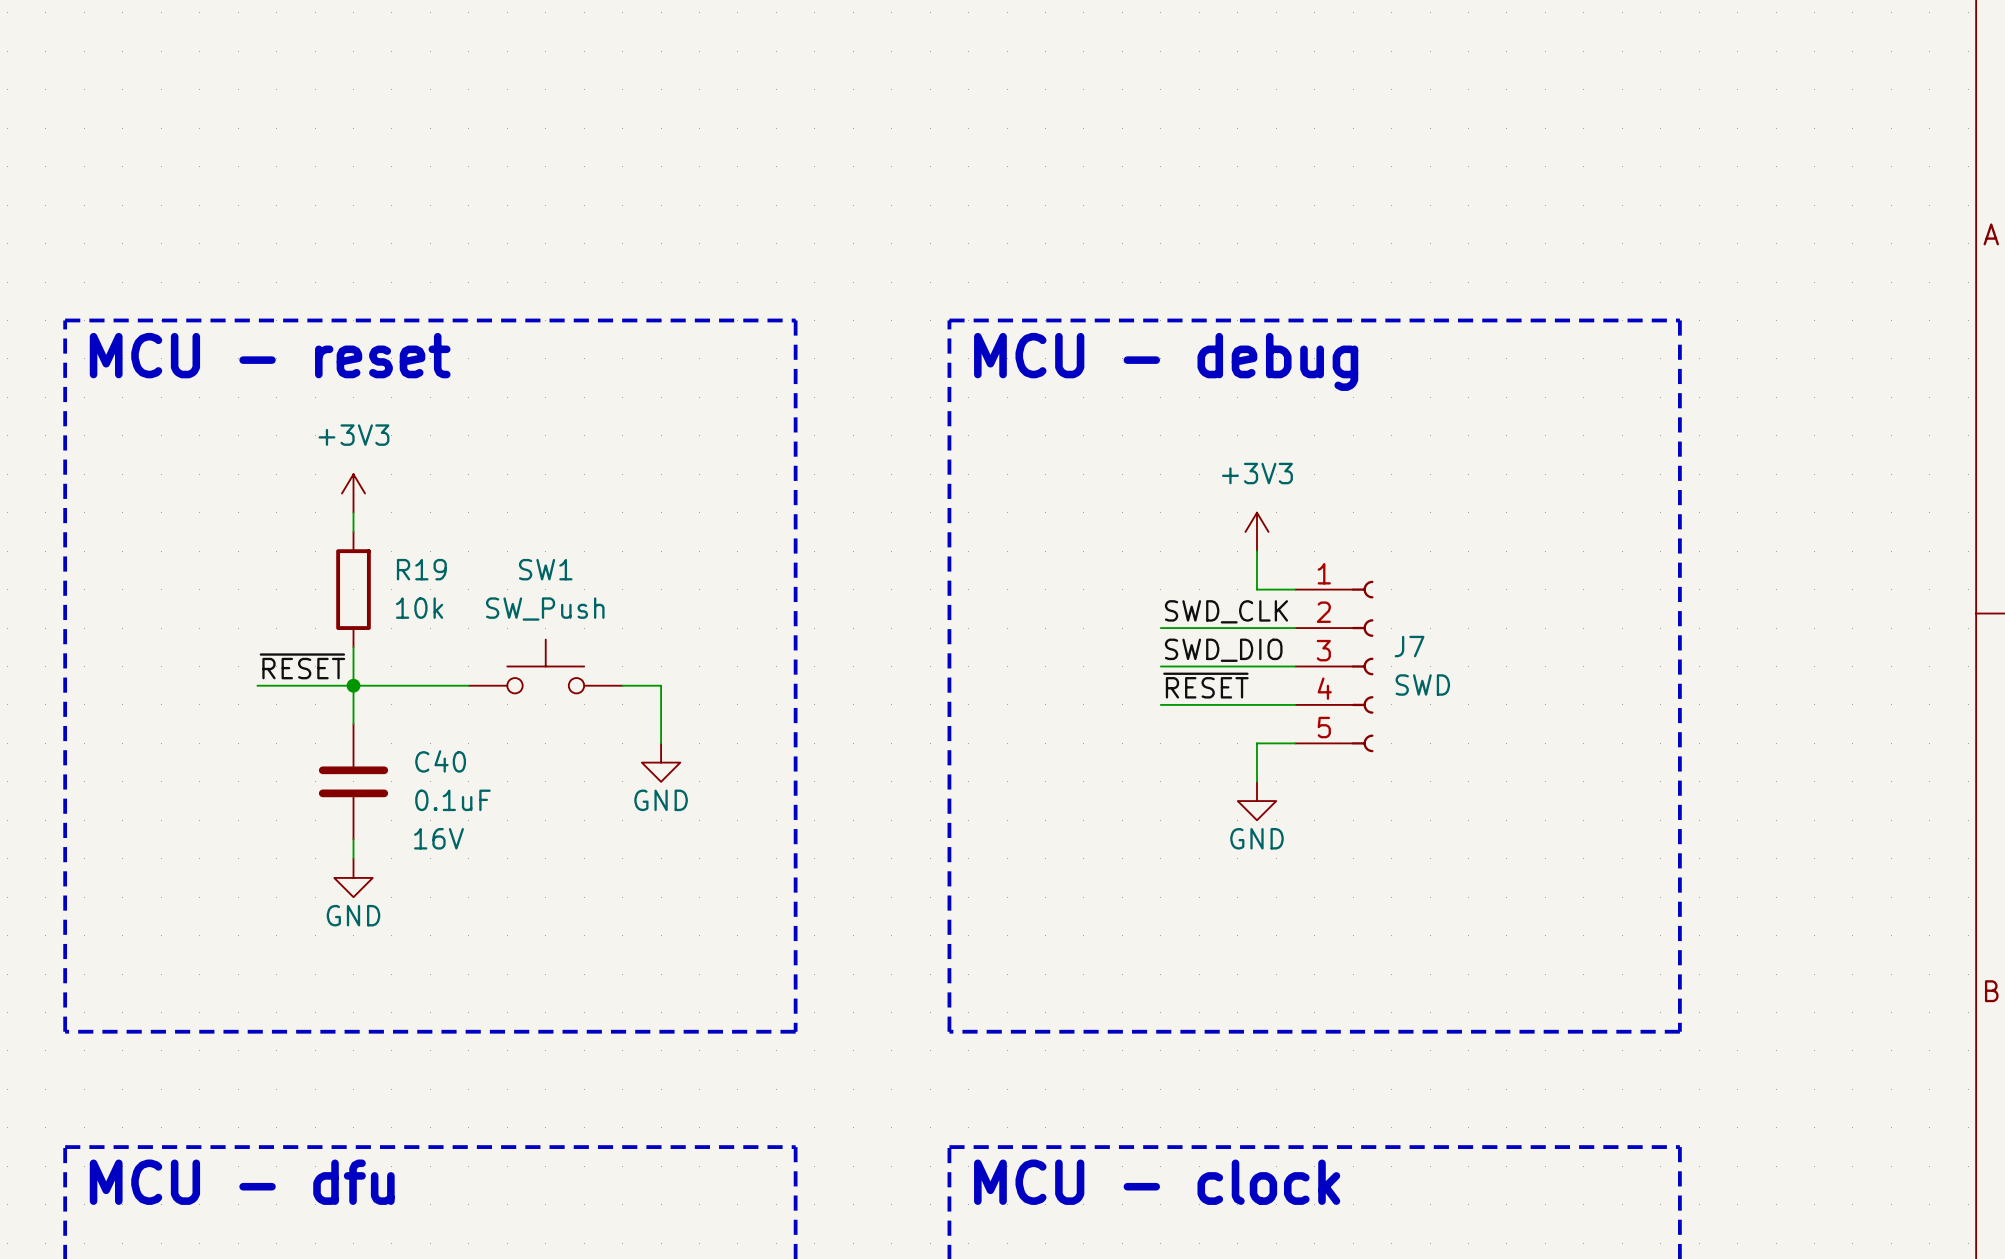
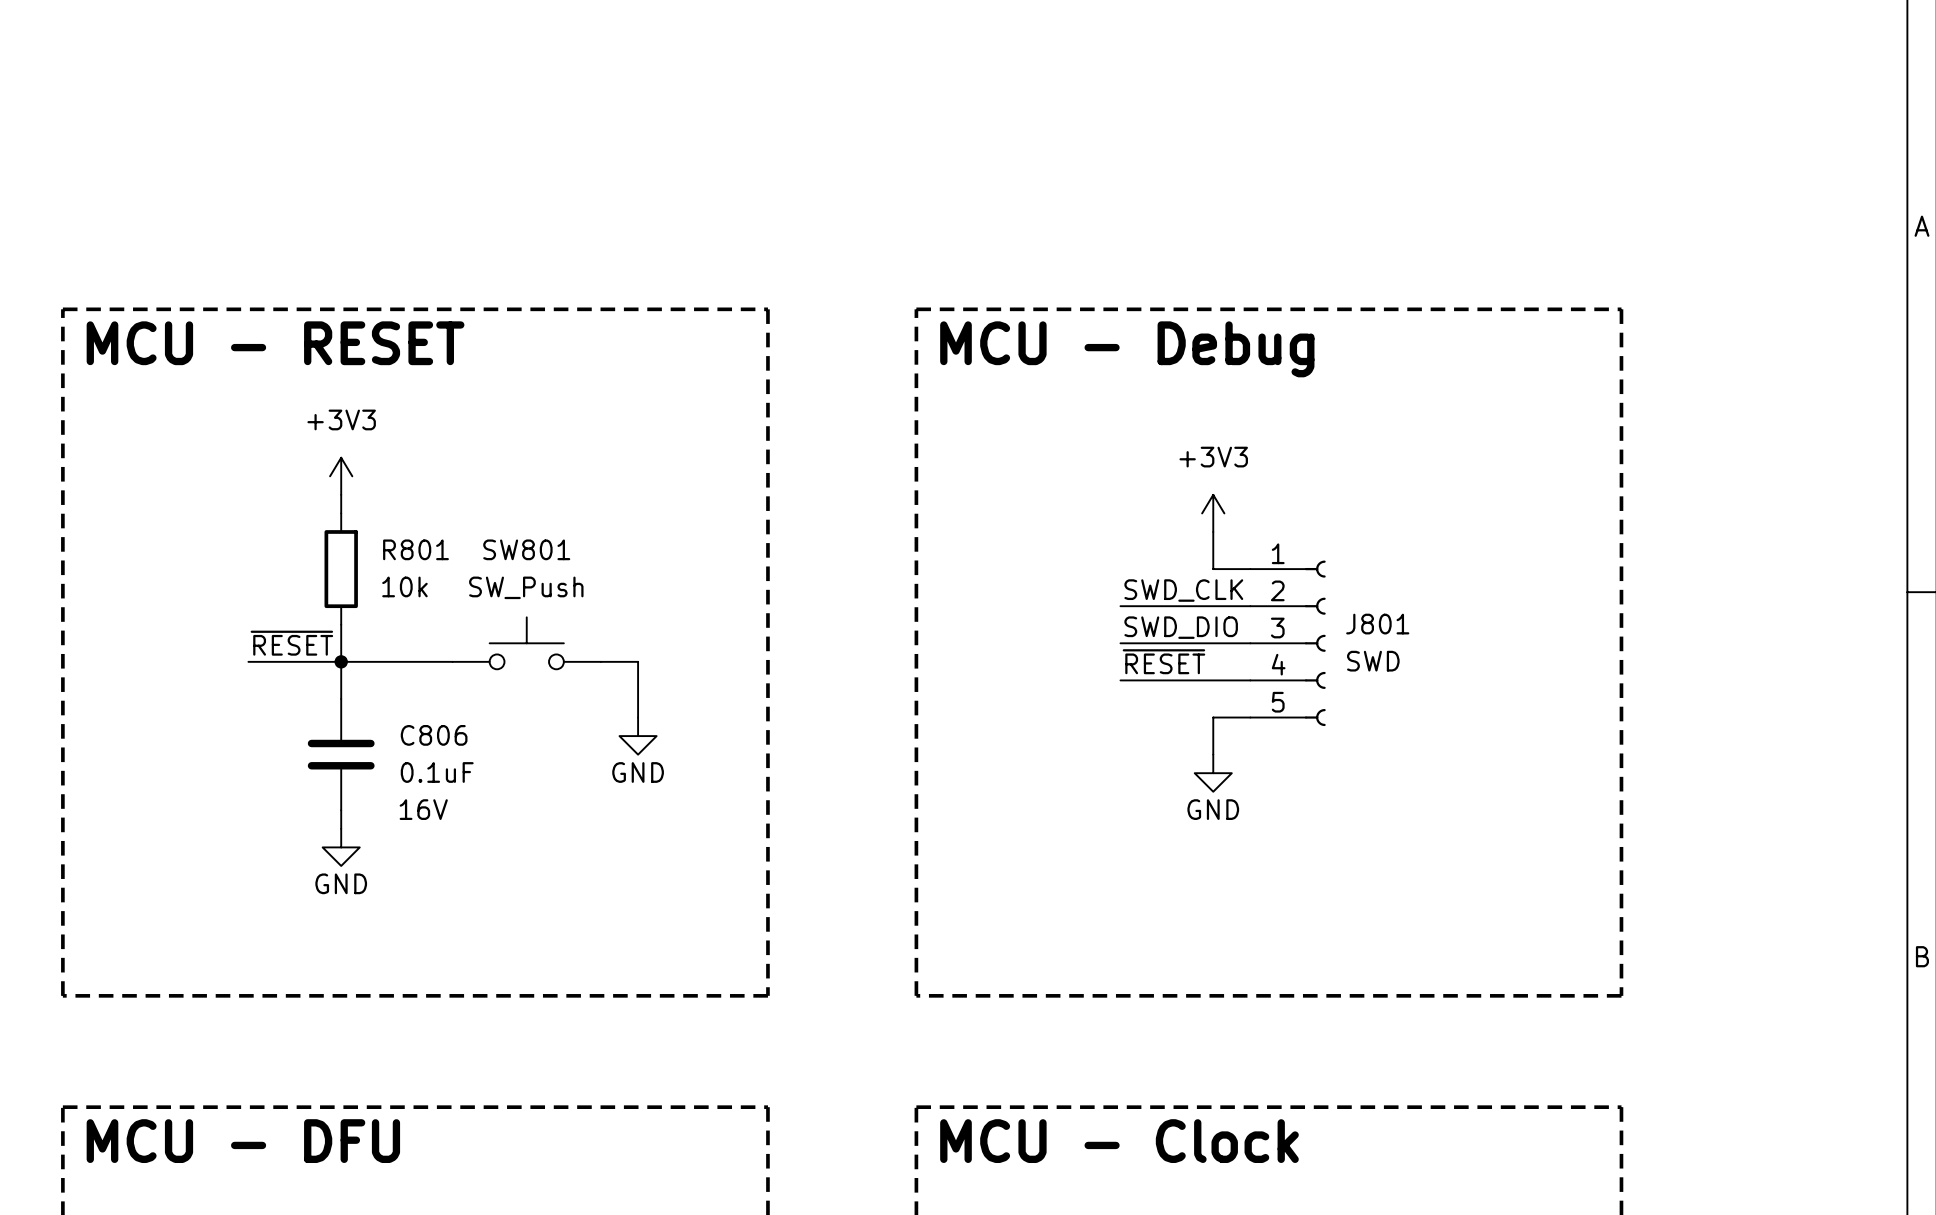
text: MCU - reset (270, 355) -> MCU - RESET (275, 343)
text: MCU - debug (1166, 361) -> MCU - Debug (1127, 349)
R19 name: R19 (421, 569) -> R801 (416, 549)
SW1 name: SW1 (545, 569) -> SW801 (526, 549)
J7 name: J7 (1409, 646) -> J801 (1377, 624)
C40 name: C40 (440, 761) -> C806 (434, 735)
text: MCU - dfu (242, 1182) -> MCU - DFU (243, 1141)
text: MCU - clock (1157, 1182) -> MCU - Clock (1119, 1141)

